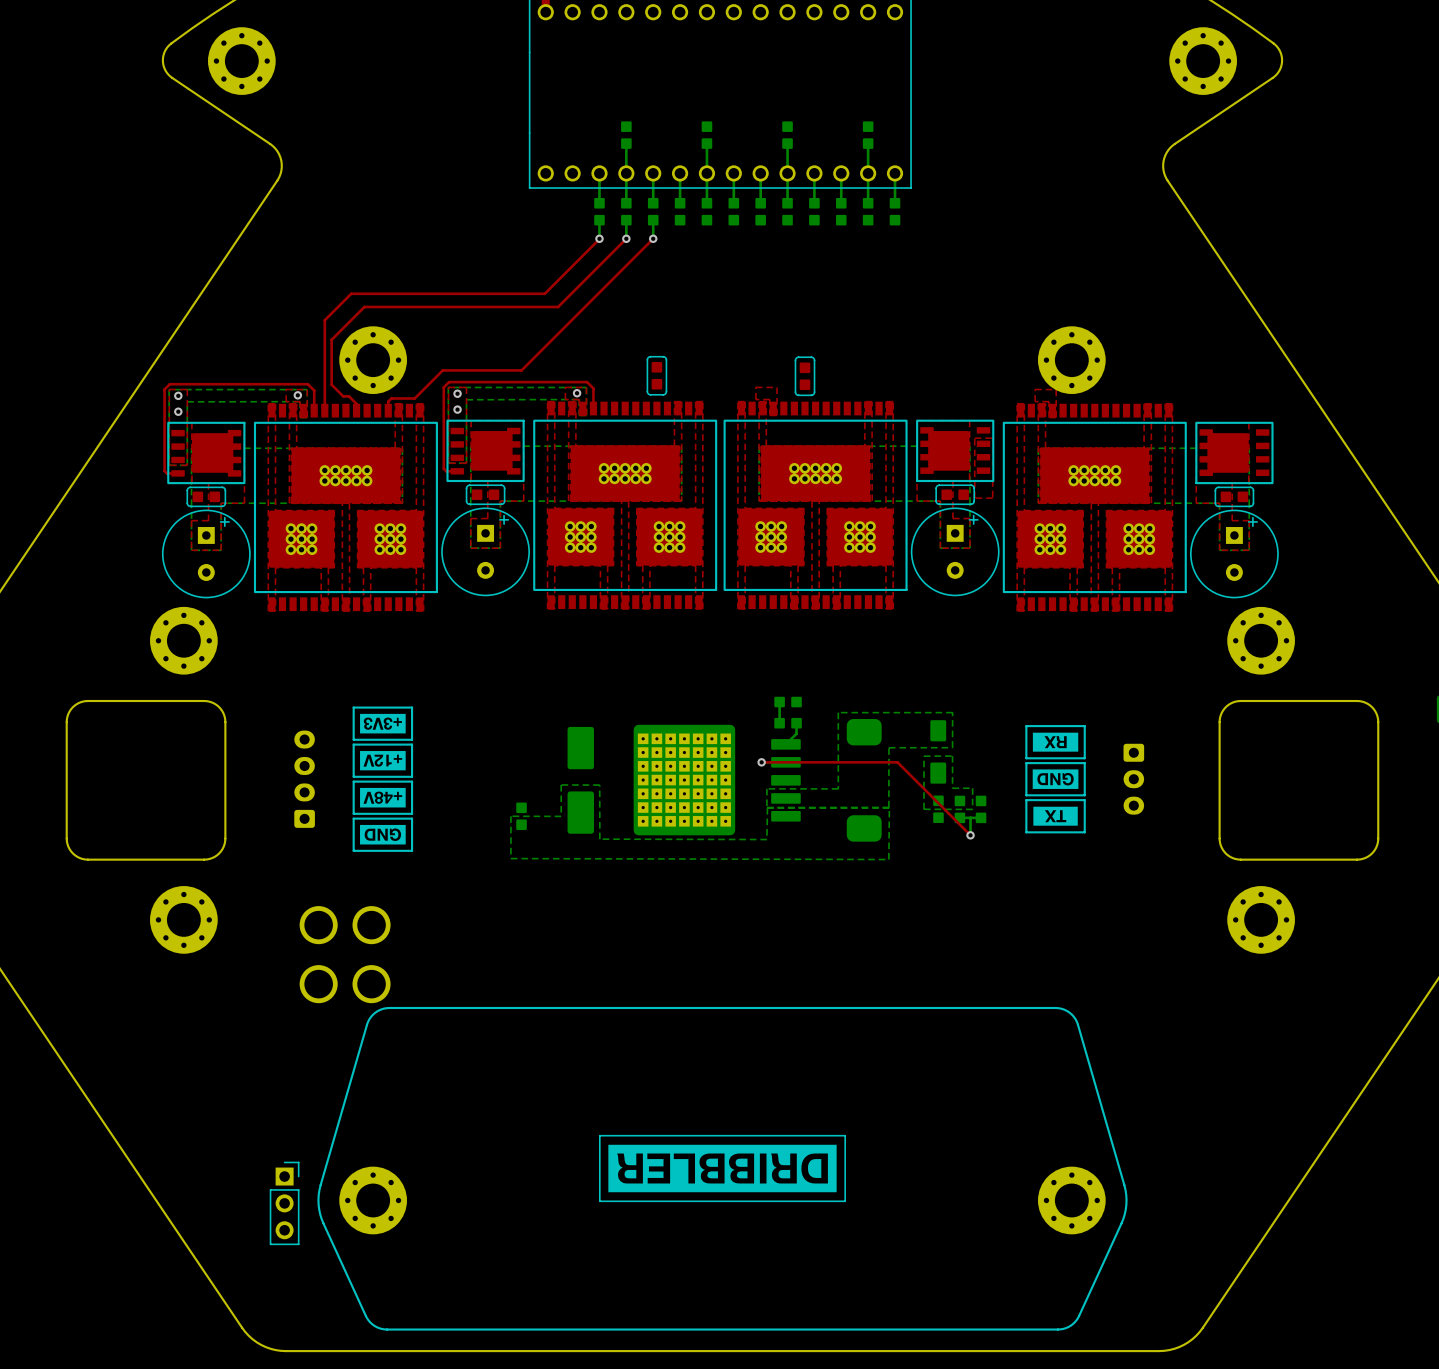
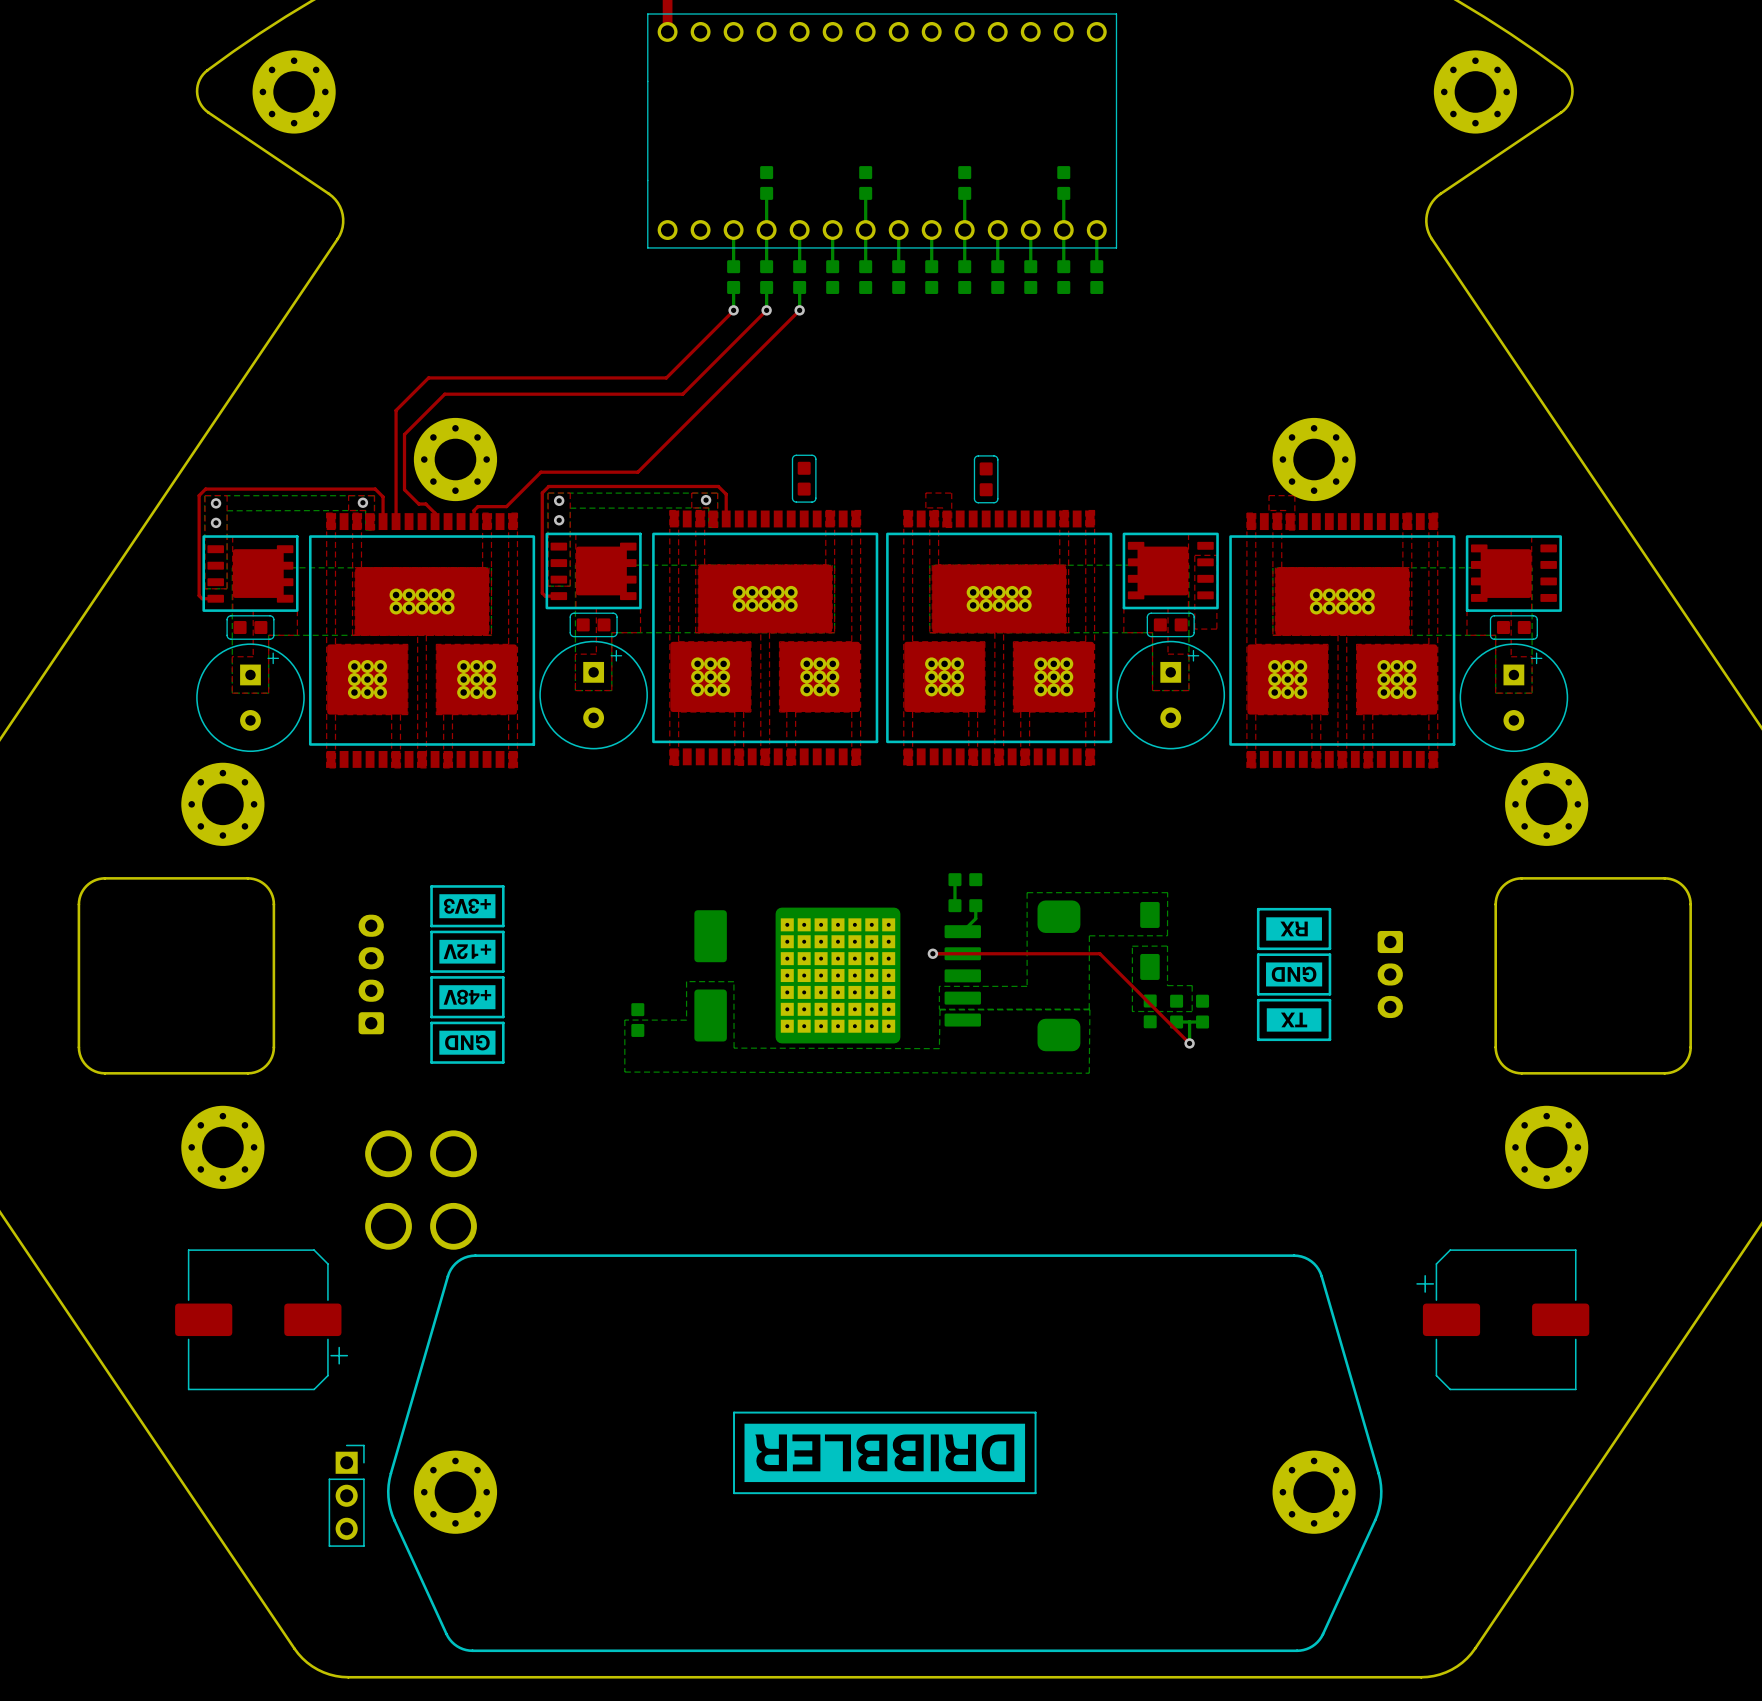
part: none -> (261, 1319)
part: none -> (1502, 1319)

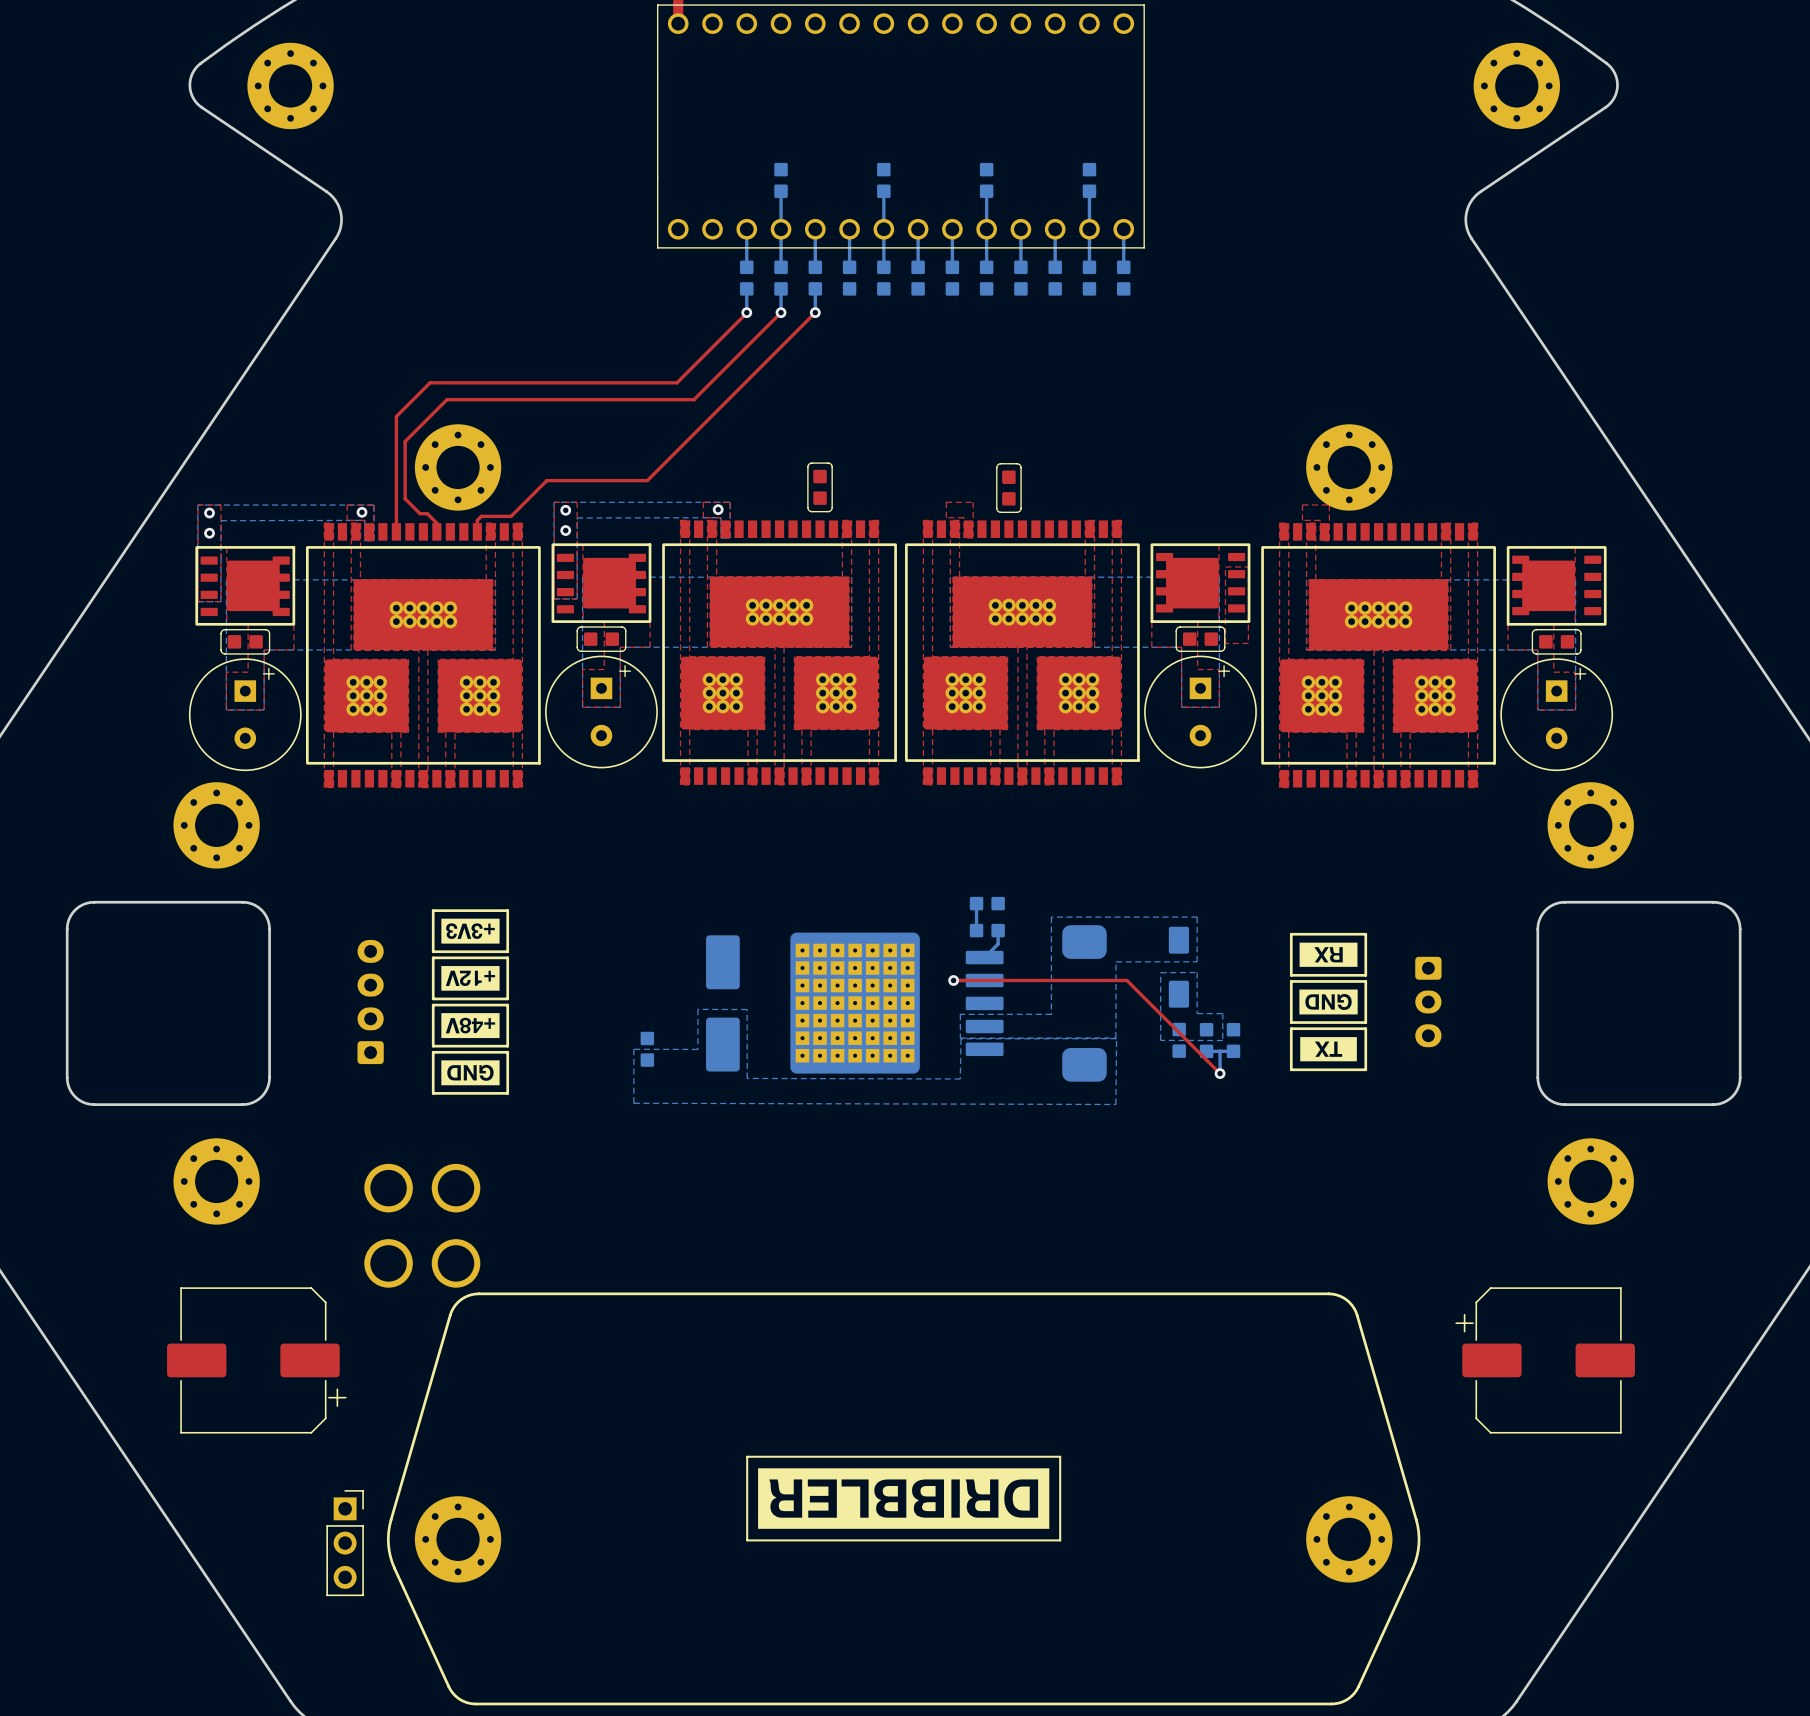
top track: (726, 518) (726, 494) (718, 486) (548, 486) (542, 492) (542, 593) (545, 596) (558, 596) -> none
top track: (383, 521) (383, 496) (375, 489) (205, 489) (199, 495) (199, 595) (202, 598) (215, 598) -> none

